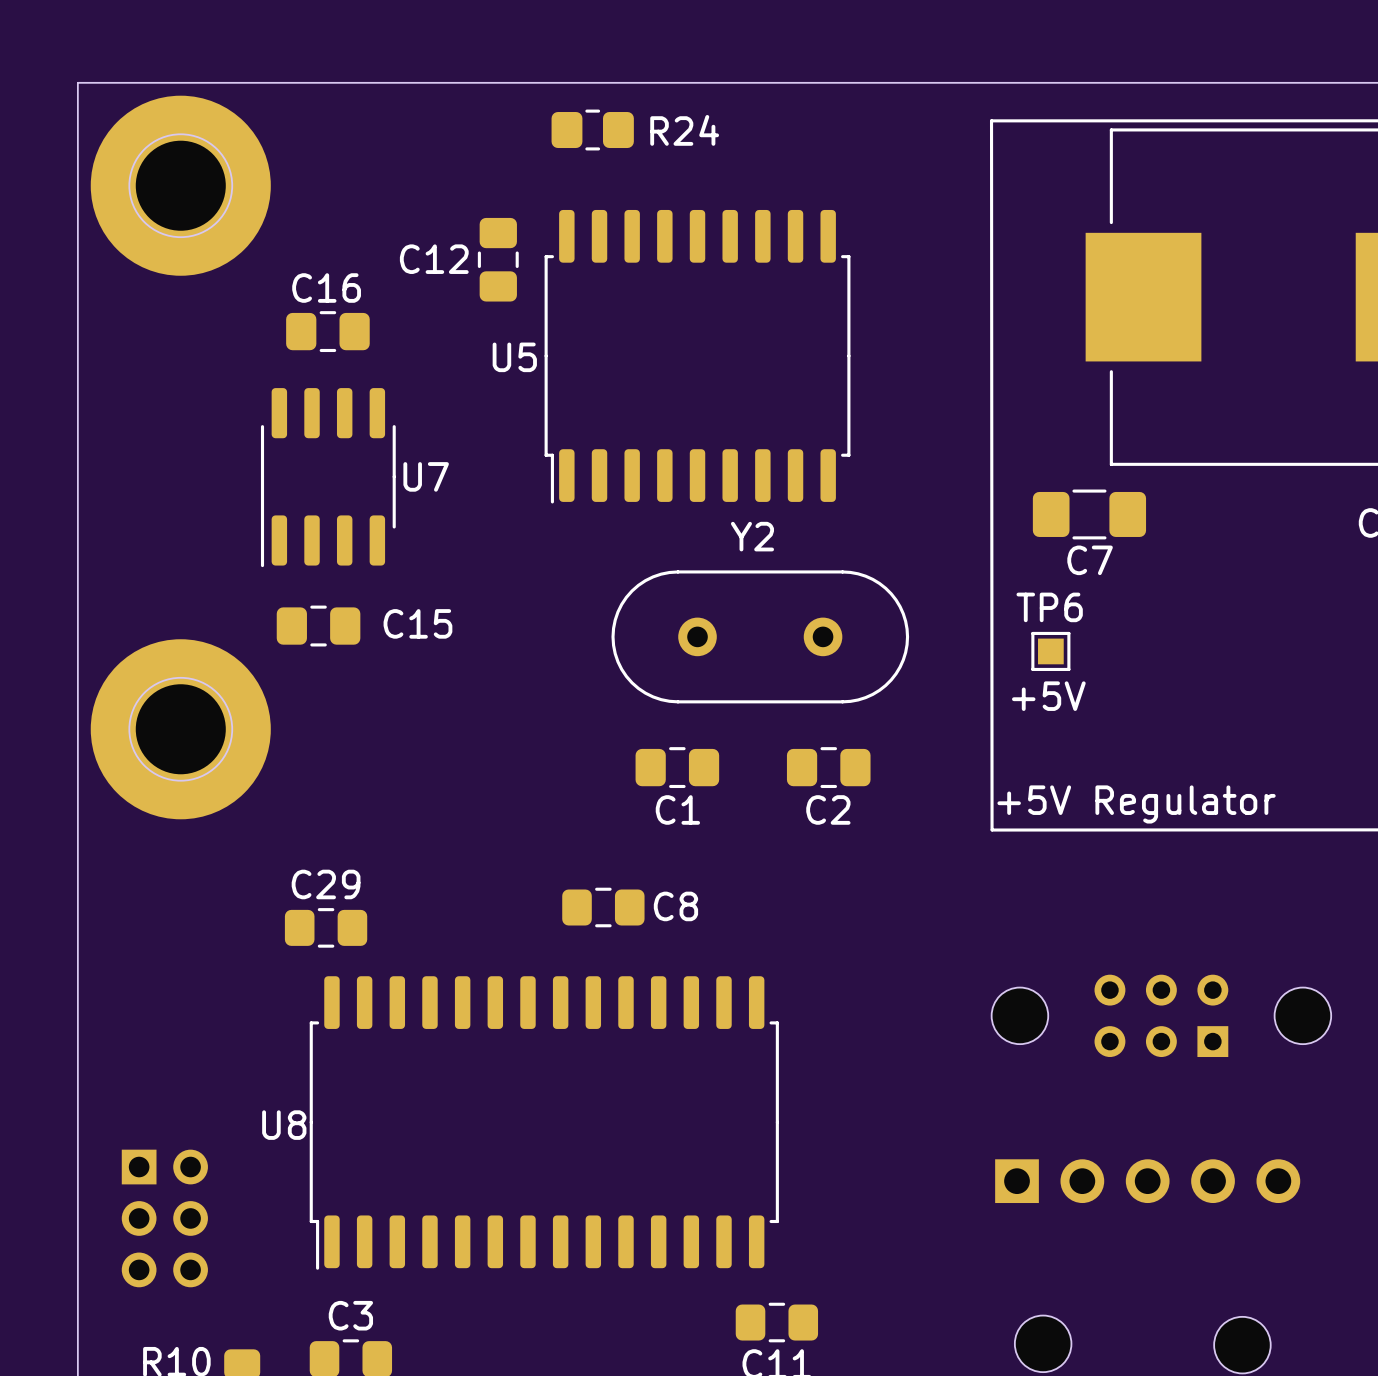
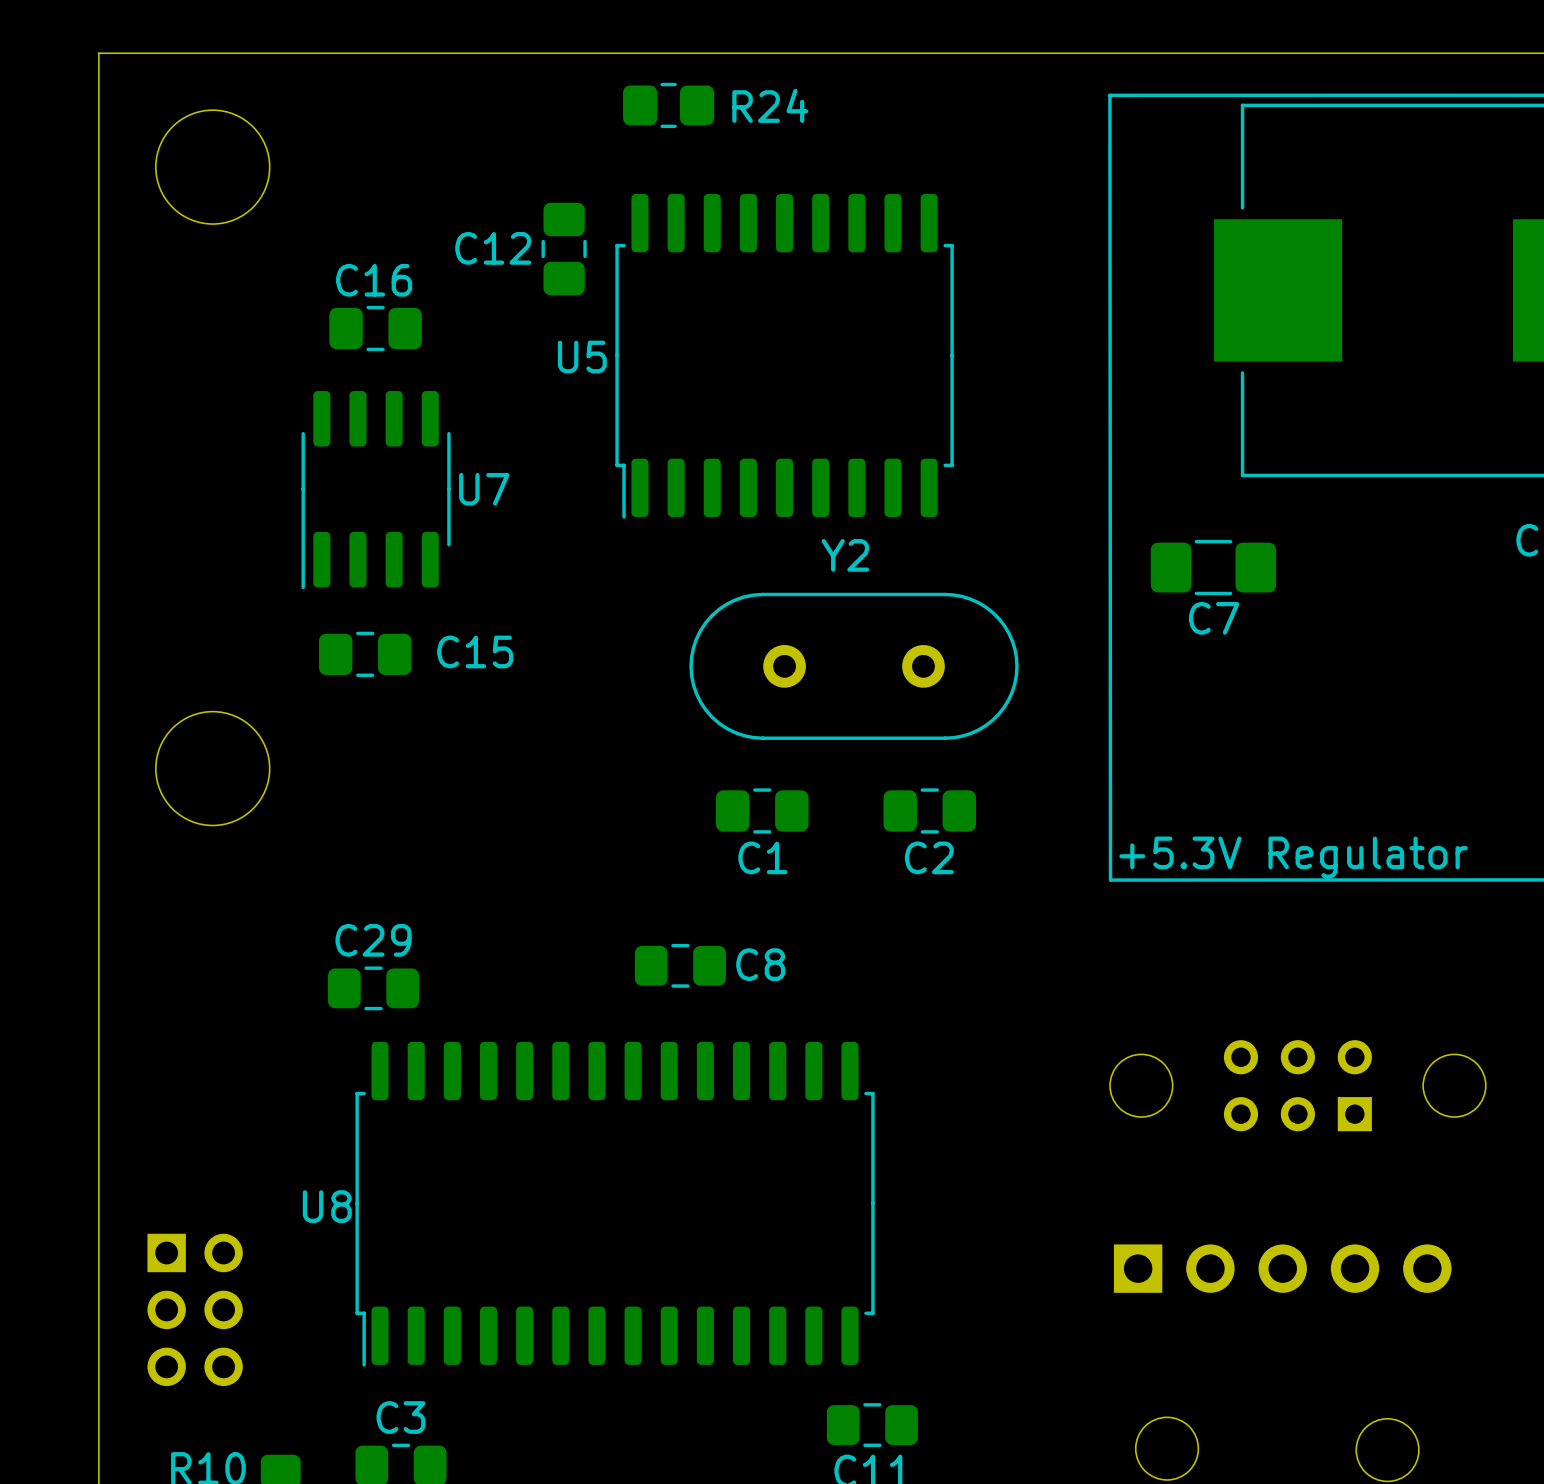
part: (180, 185) -> none
C7 position: (1089, 514) -> (1213, 567)
TP6: (1050, 651) -> none
text: +5V (1048, 696) -> none
part: (180, 729) -> none
text: +5V Regulator (1136, 804) -> +5.3V Regulator (1293, 857)

